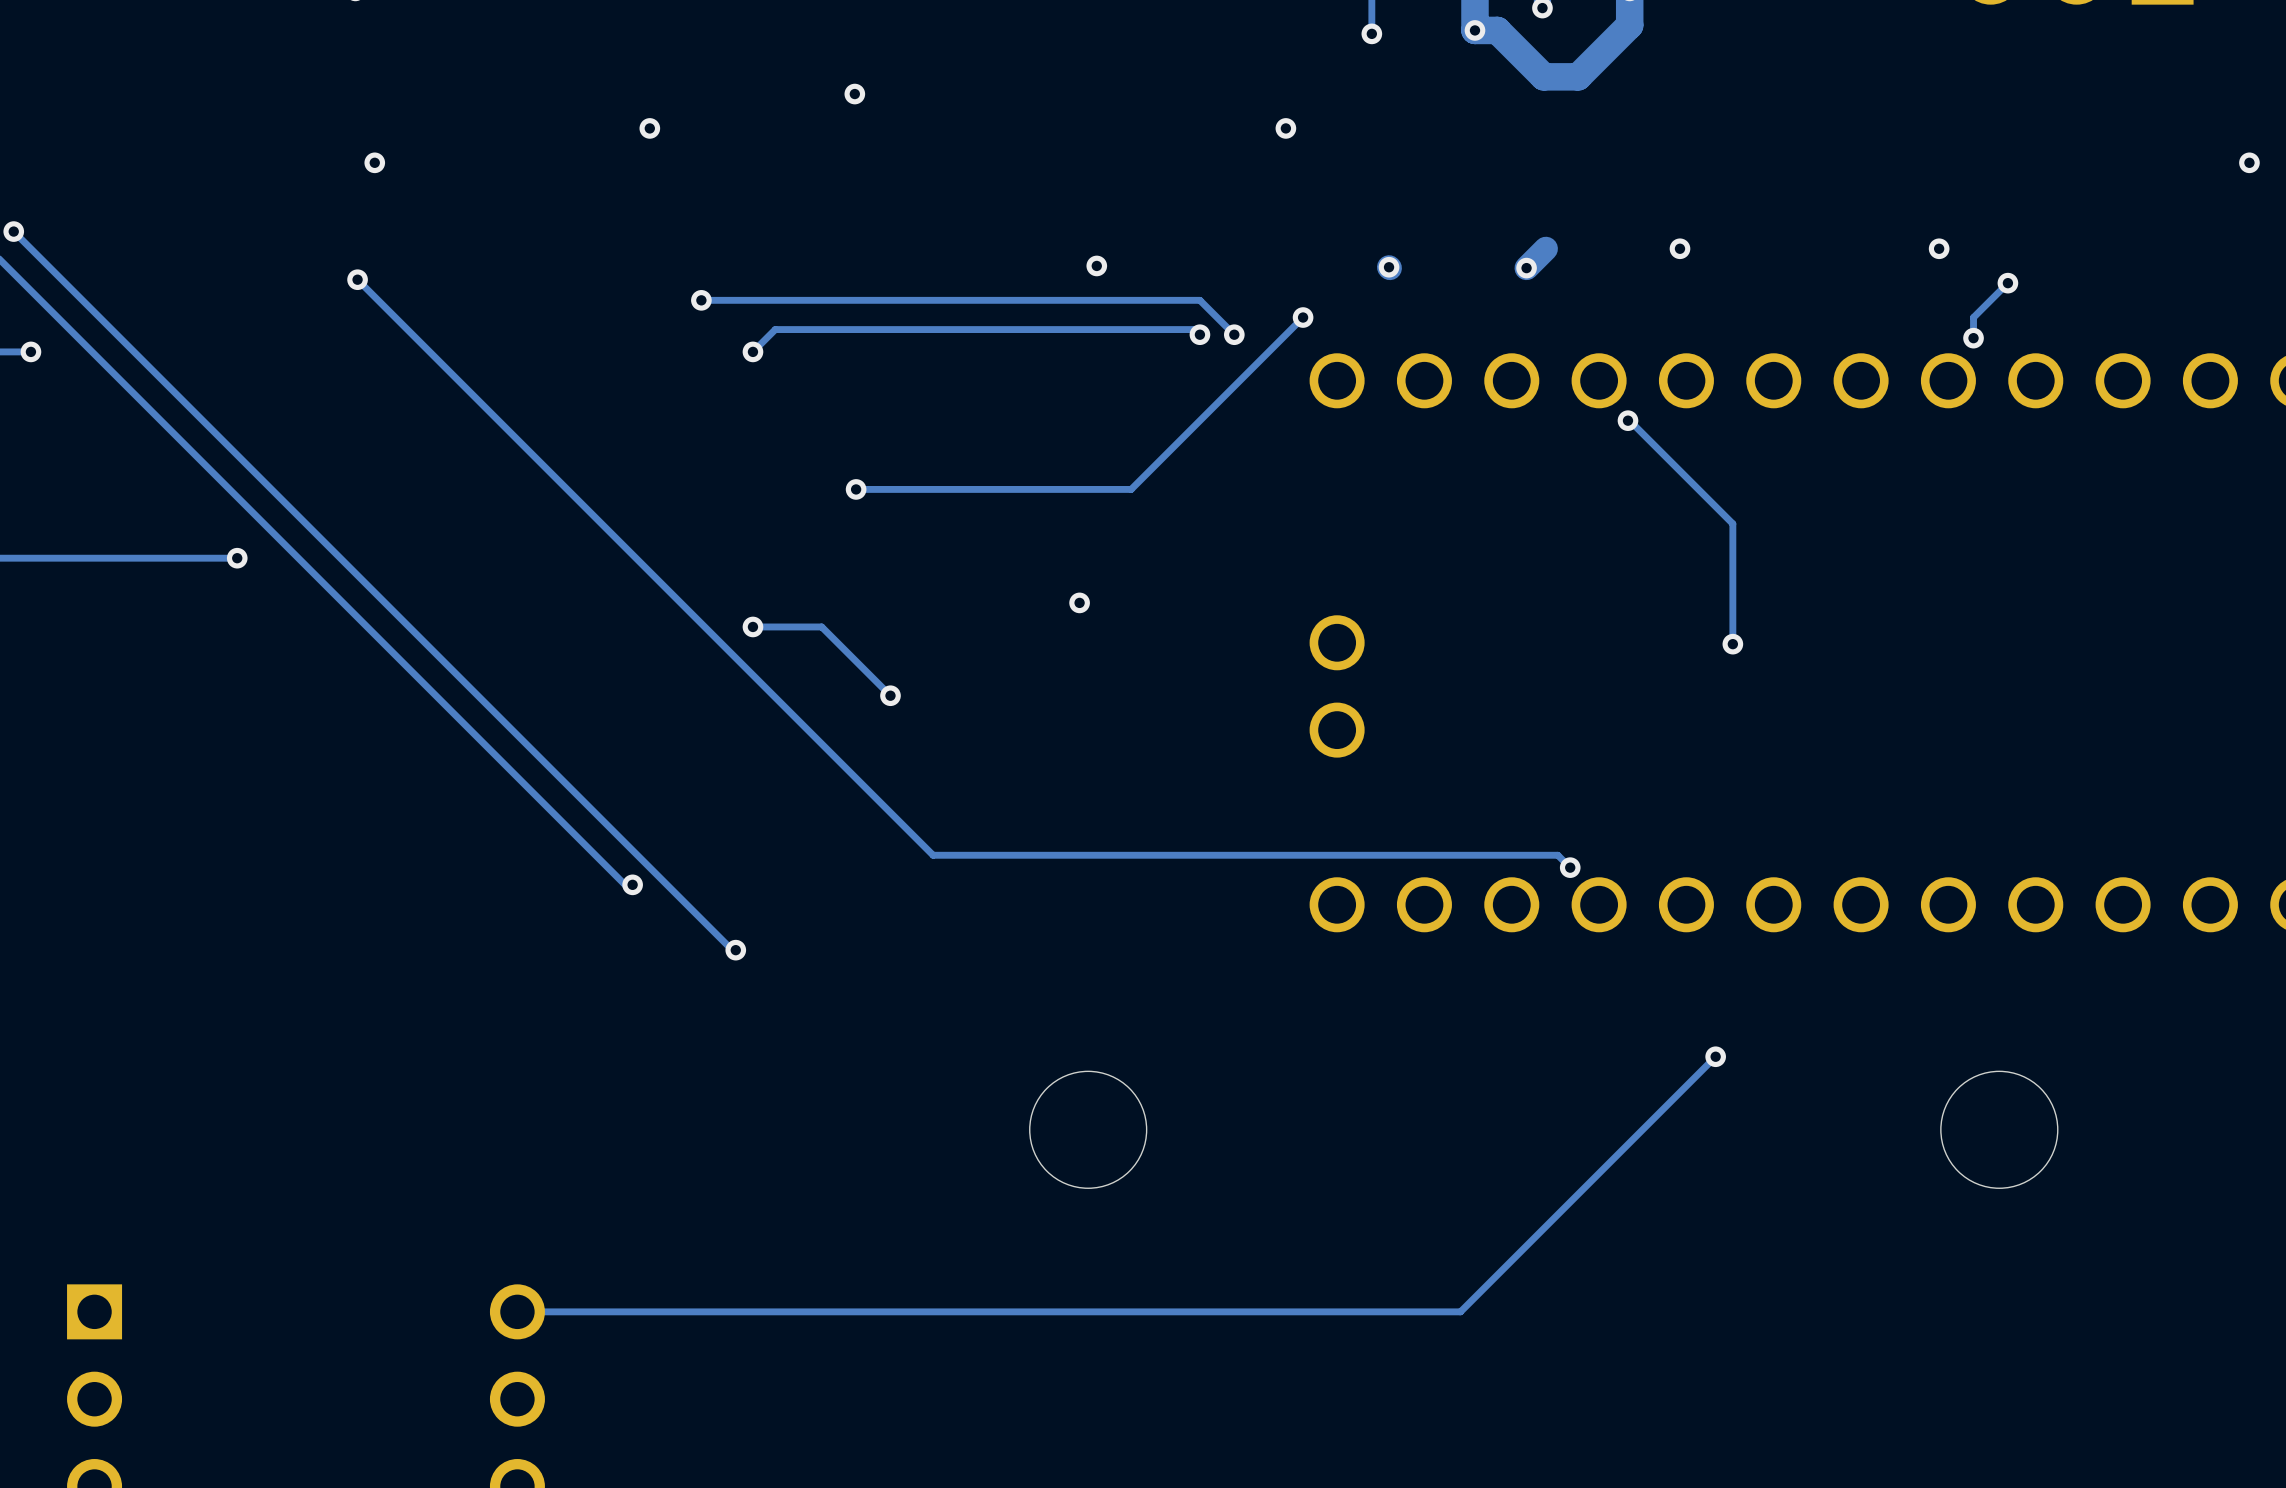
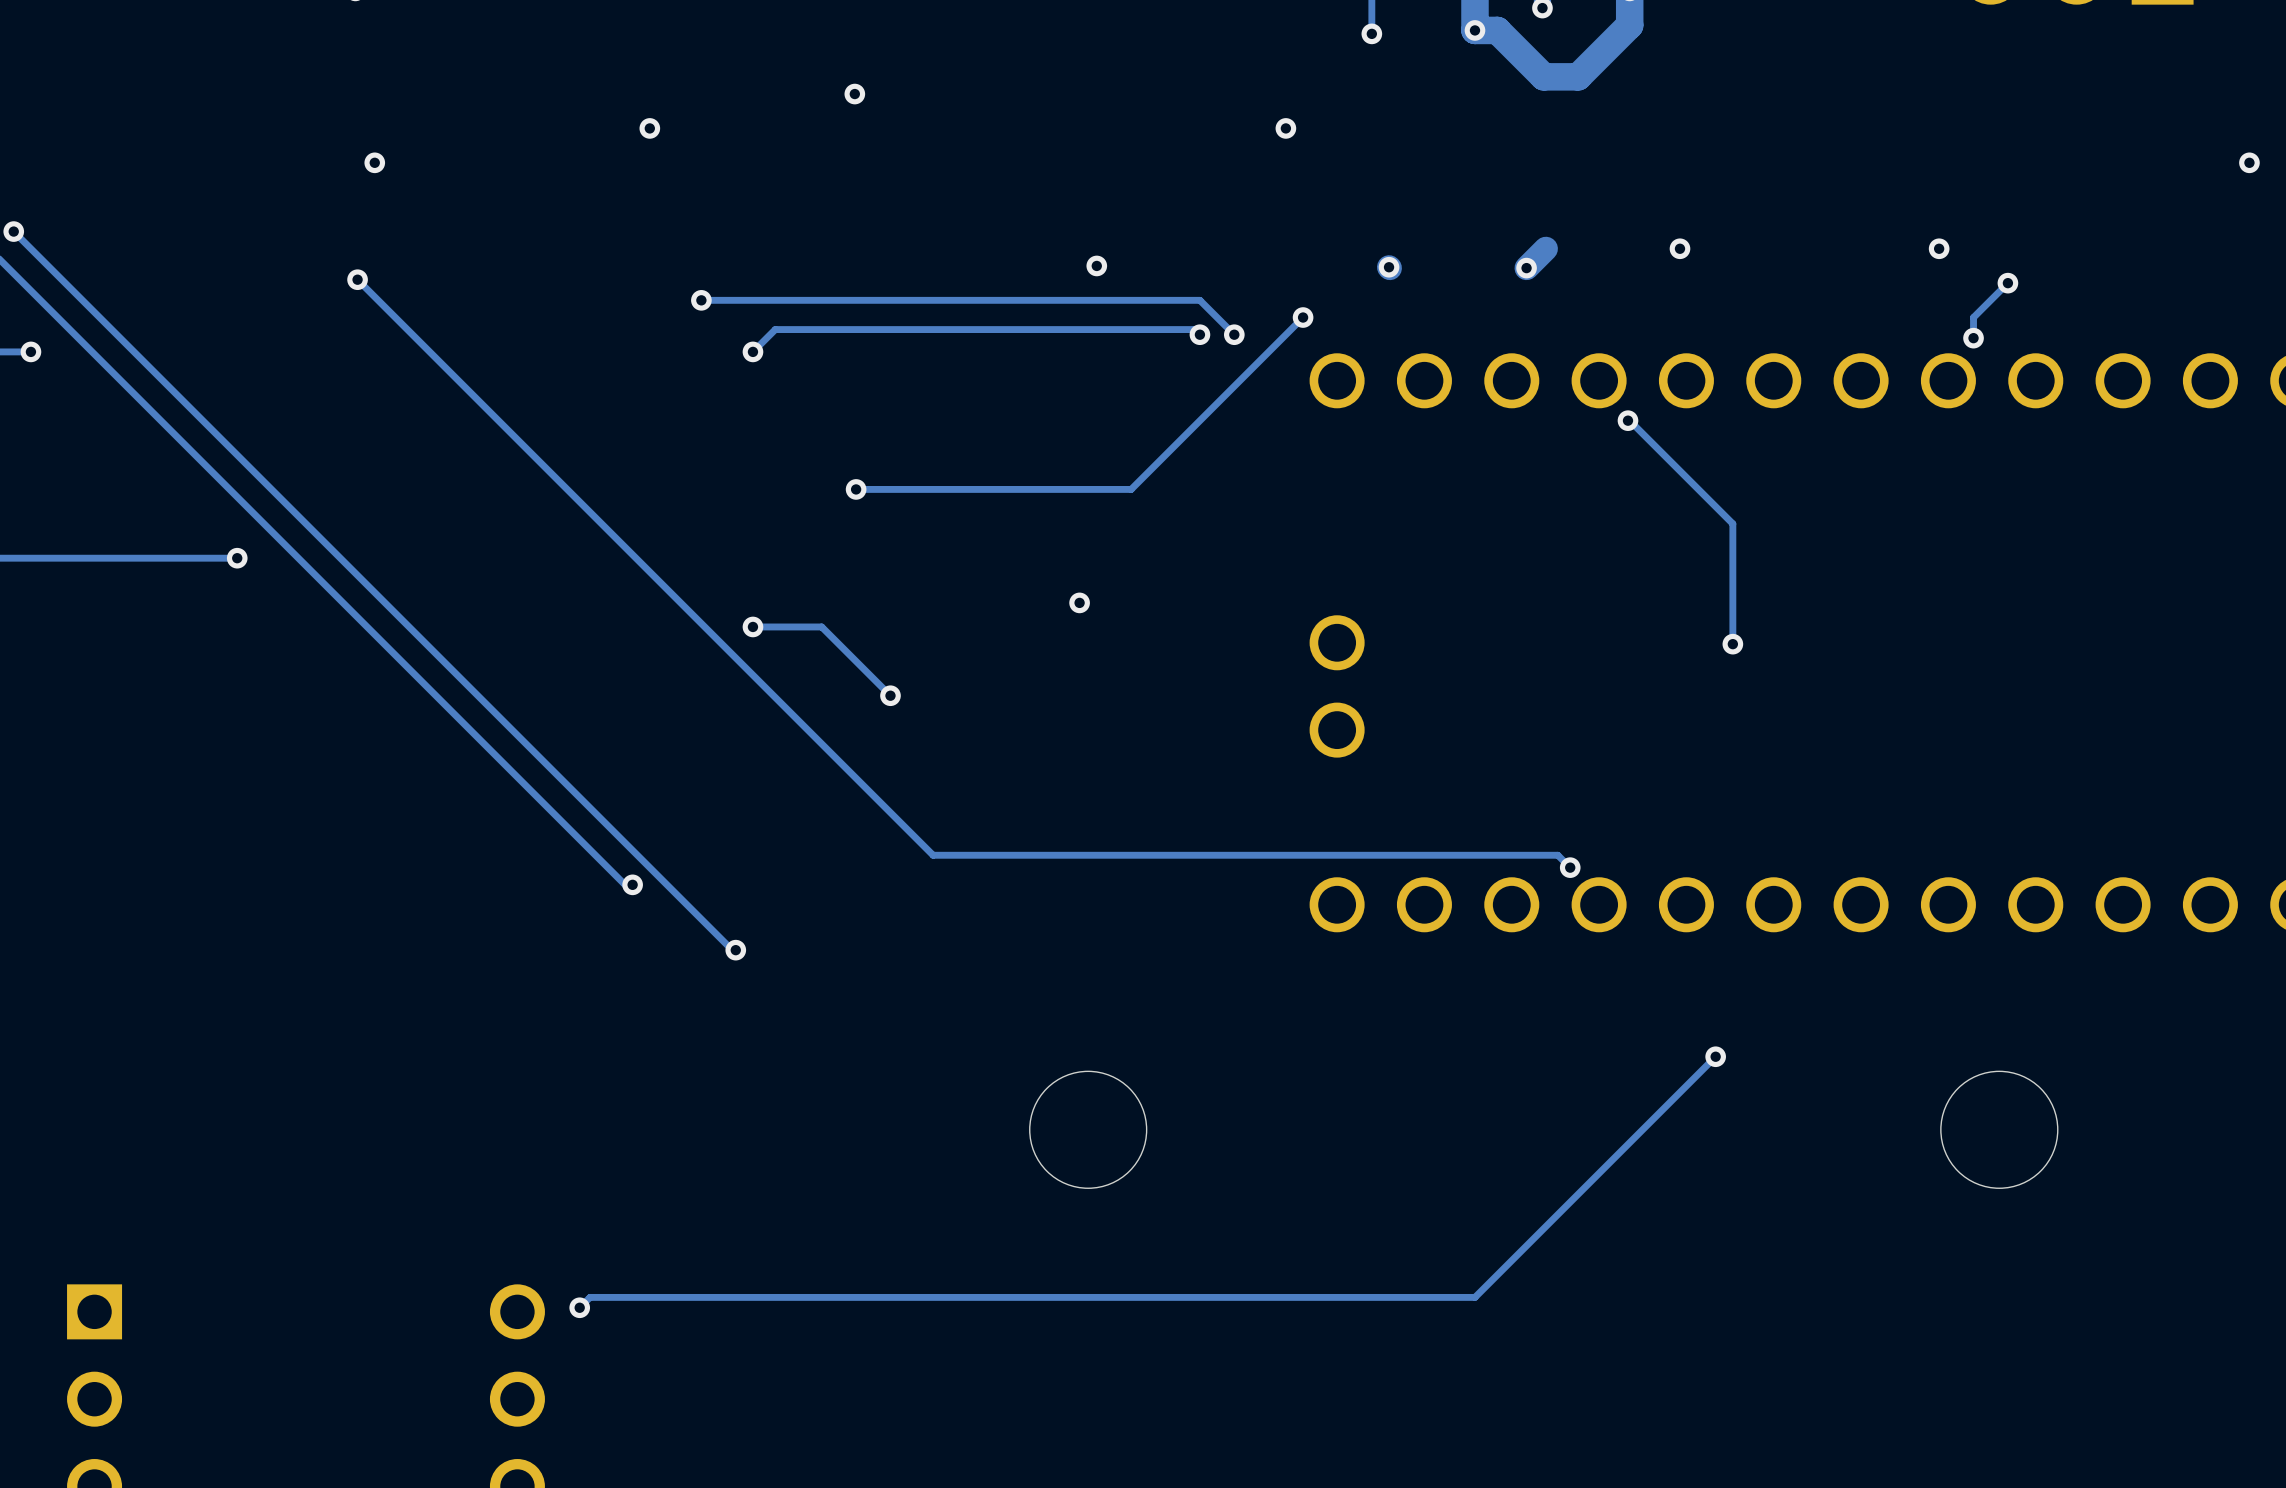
track: (1474, 1297) (1460, 1311) (543, 1311) -> (1474, 1297) (590, 1297) (579, 1307)
via: none -> (579, 1307)

